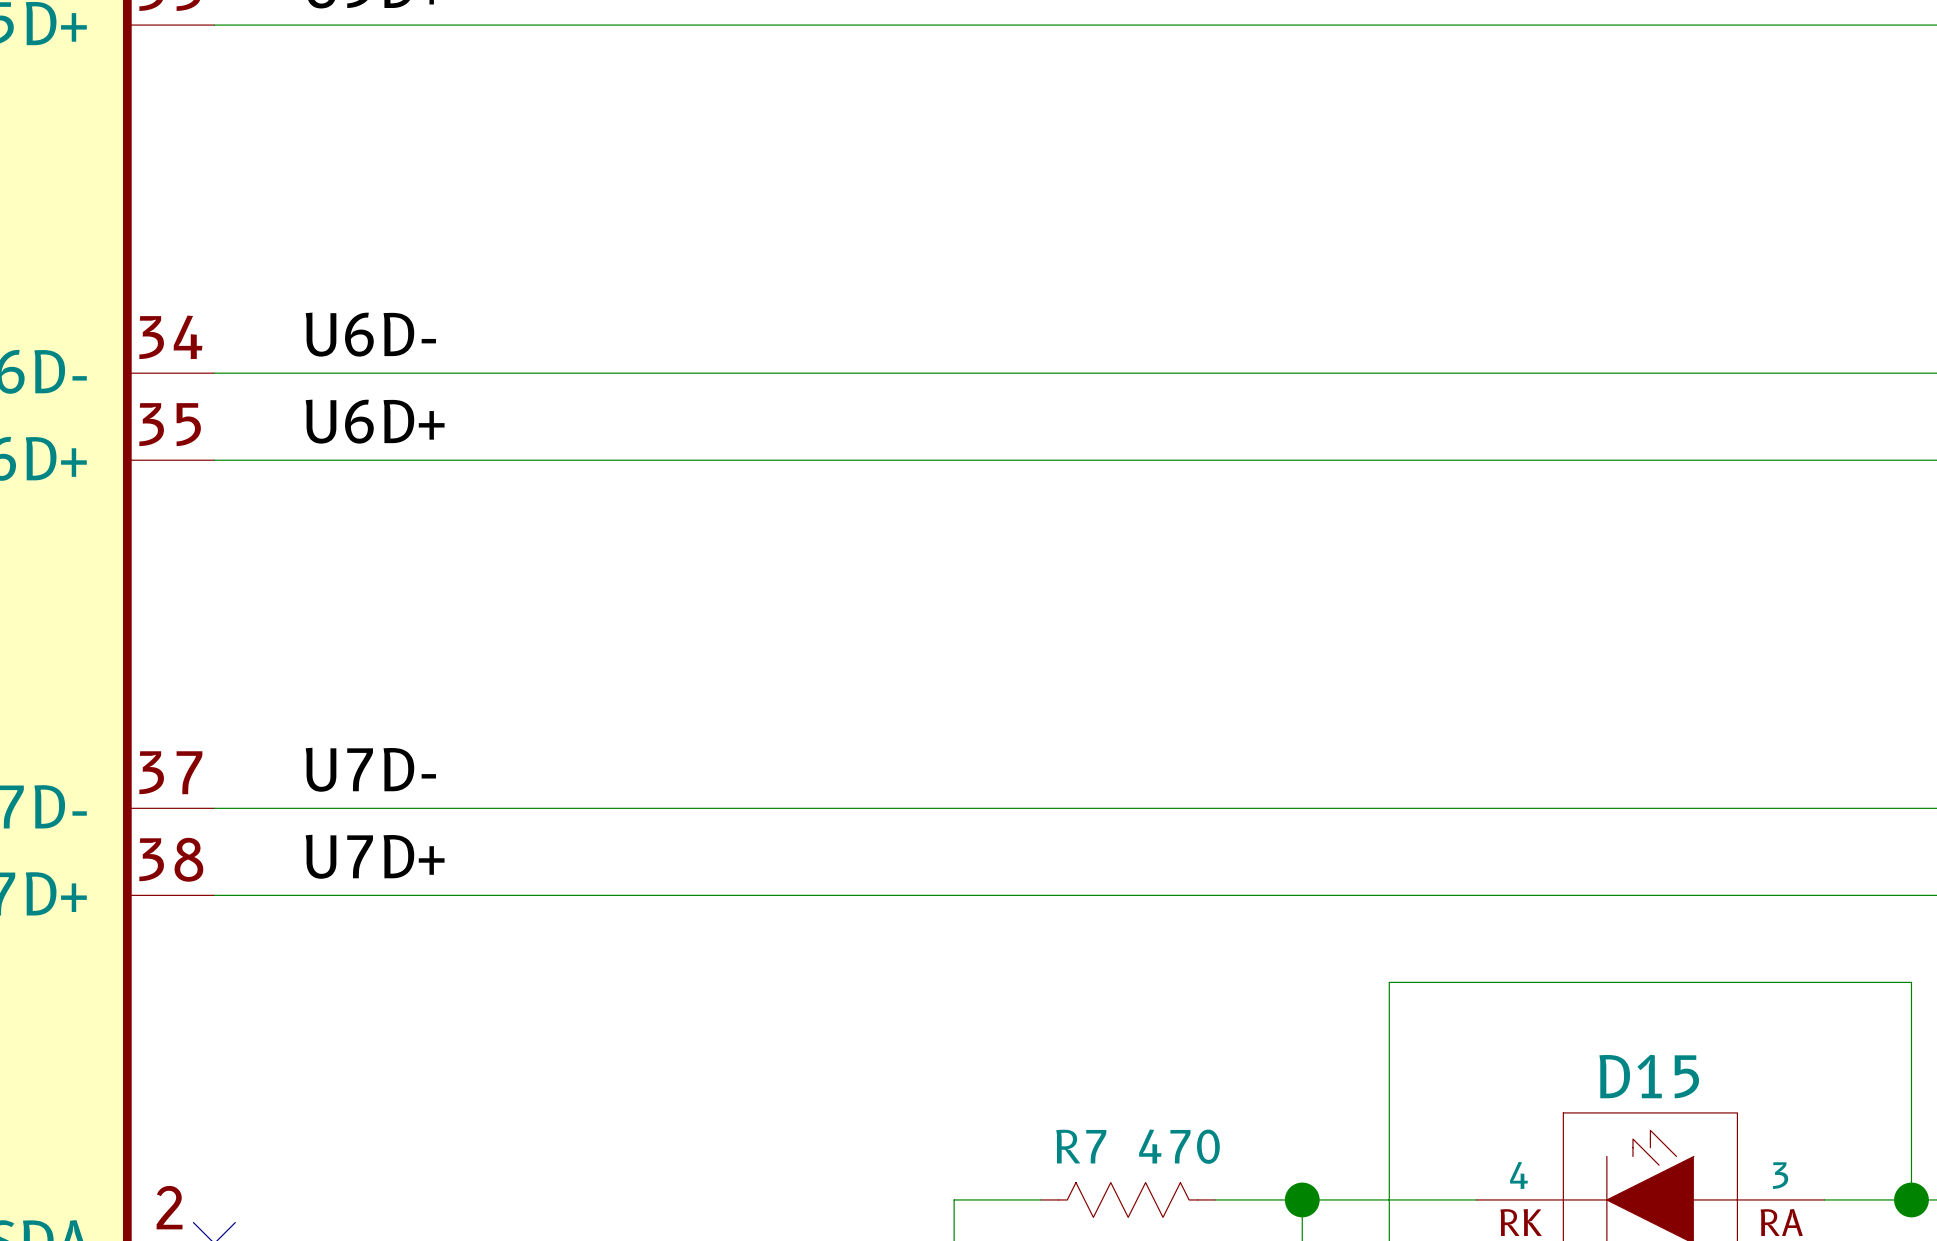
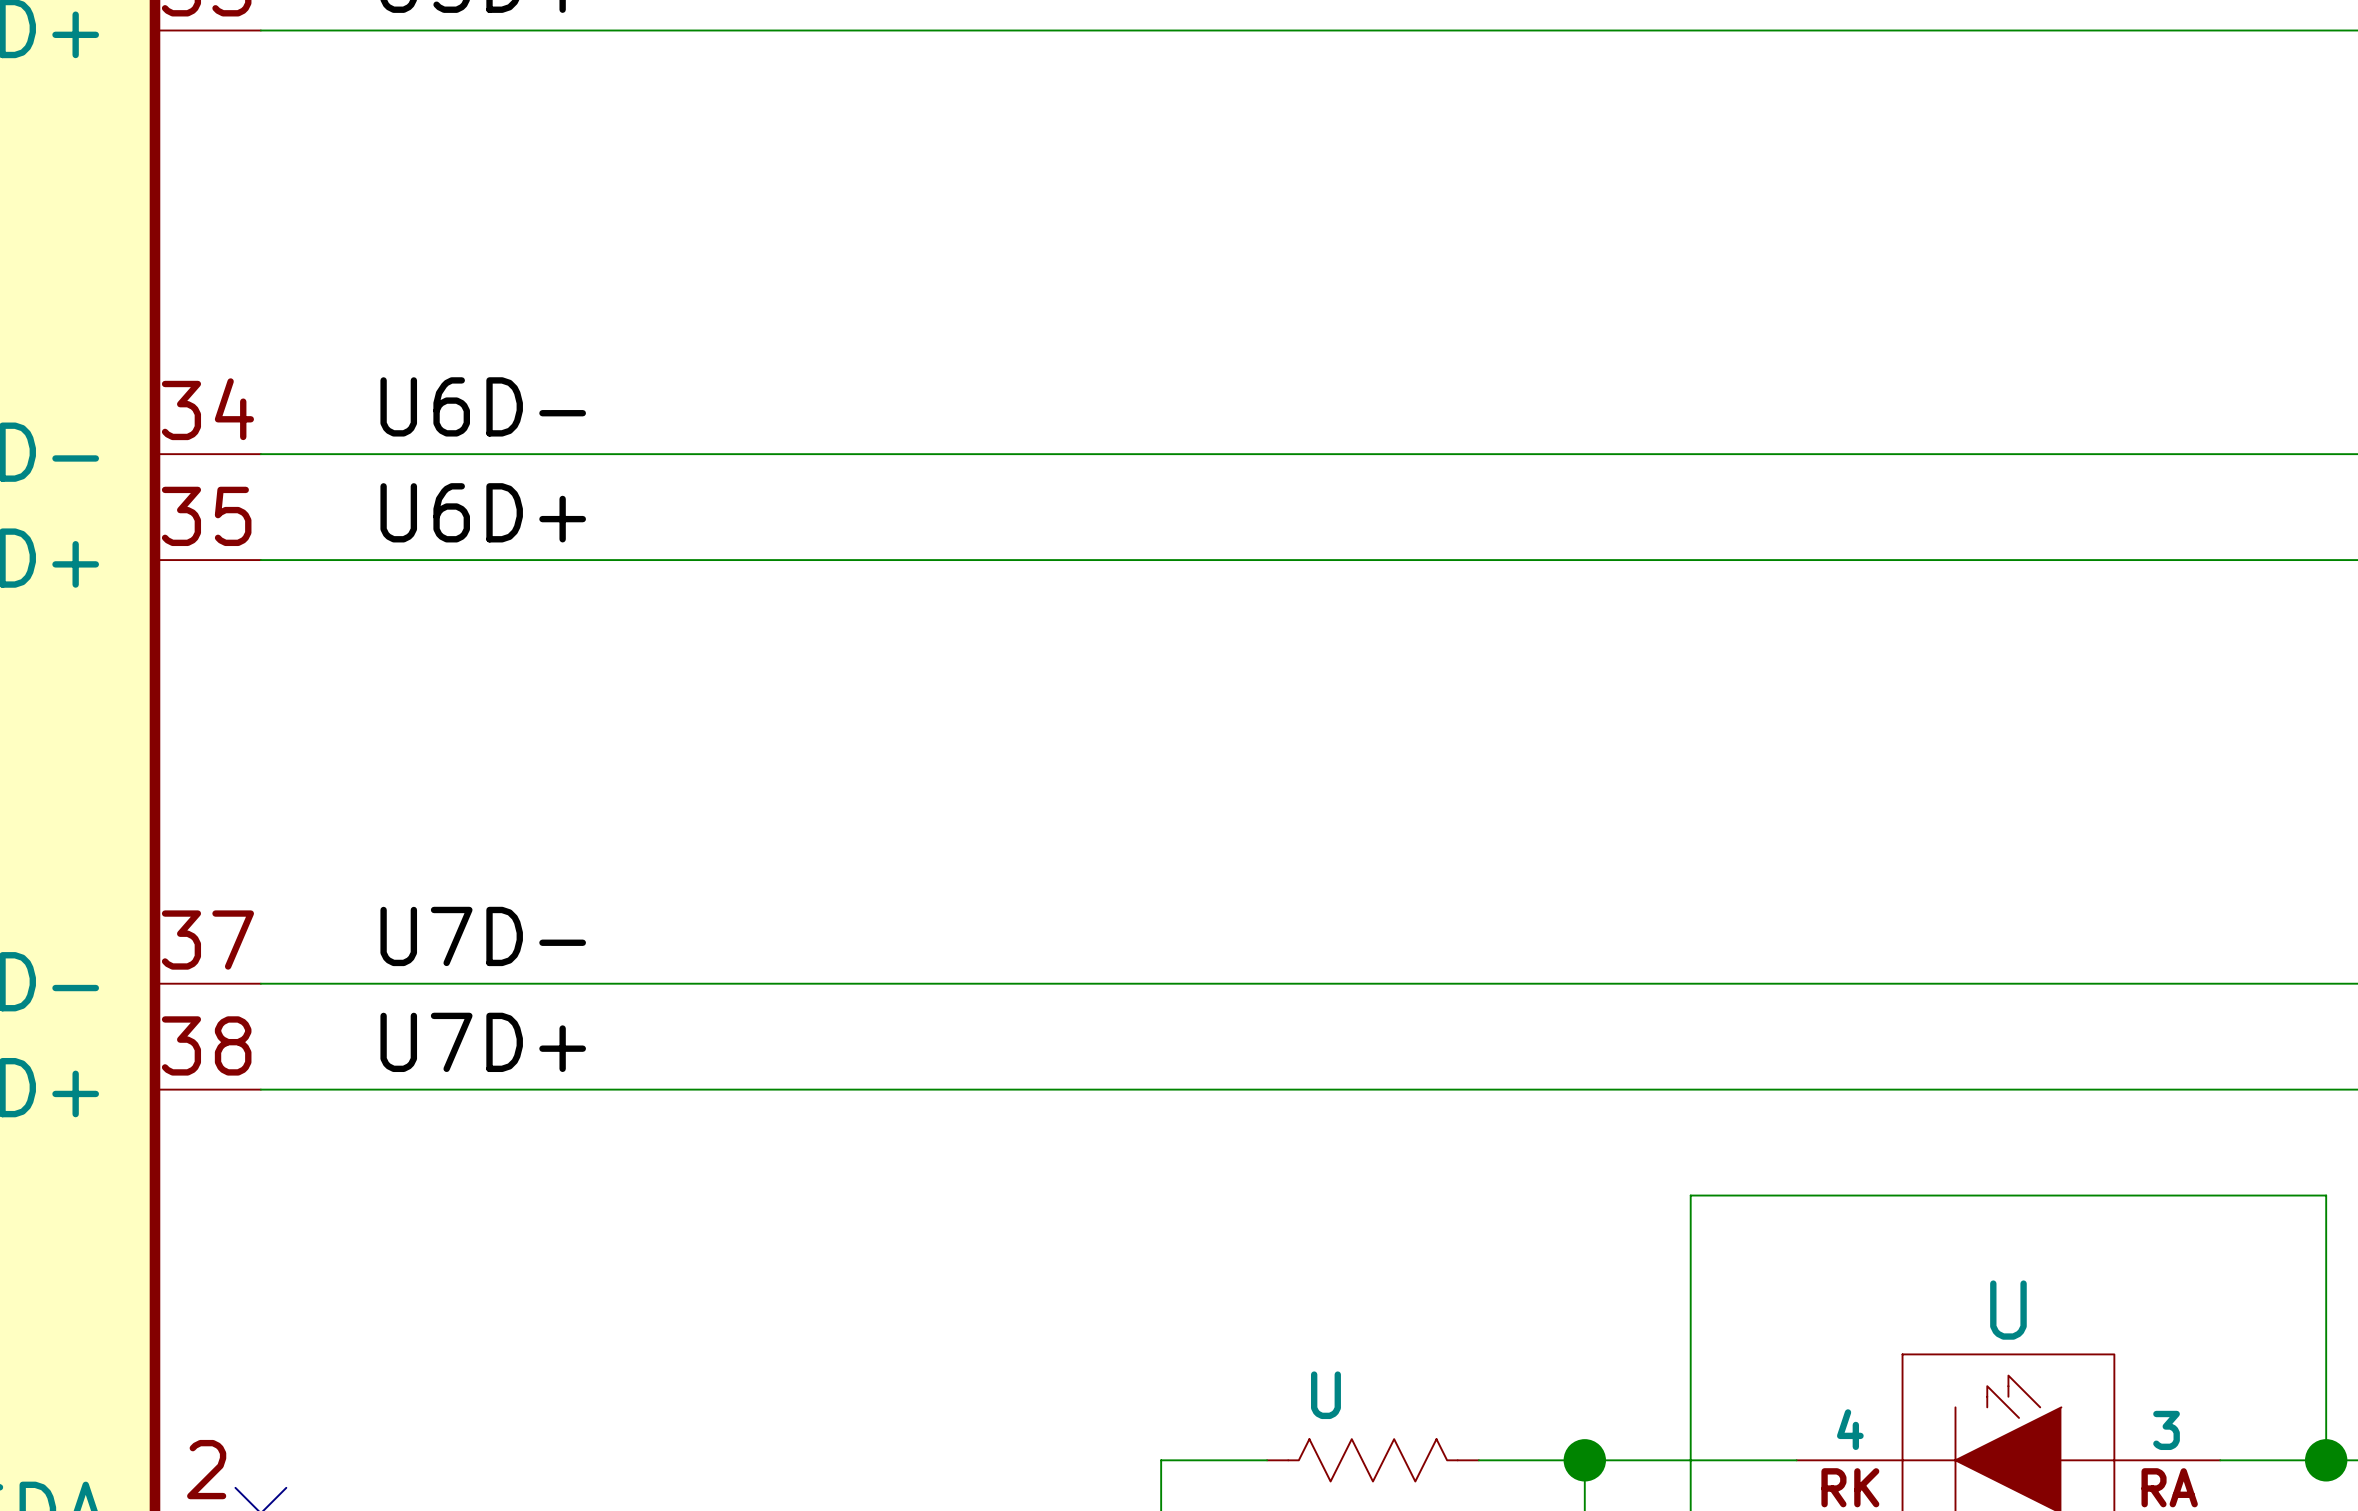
D15 name: D15 (1649, 1076) -> U (2008, 1310)
R7 name: R7 (1081, 1146) -> U (1325, 1395)
R7 value: 470 (1179, 1146) -> none

